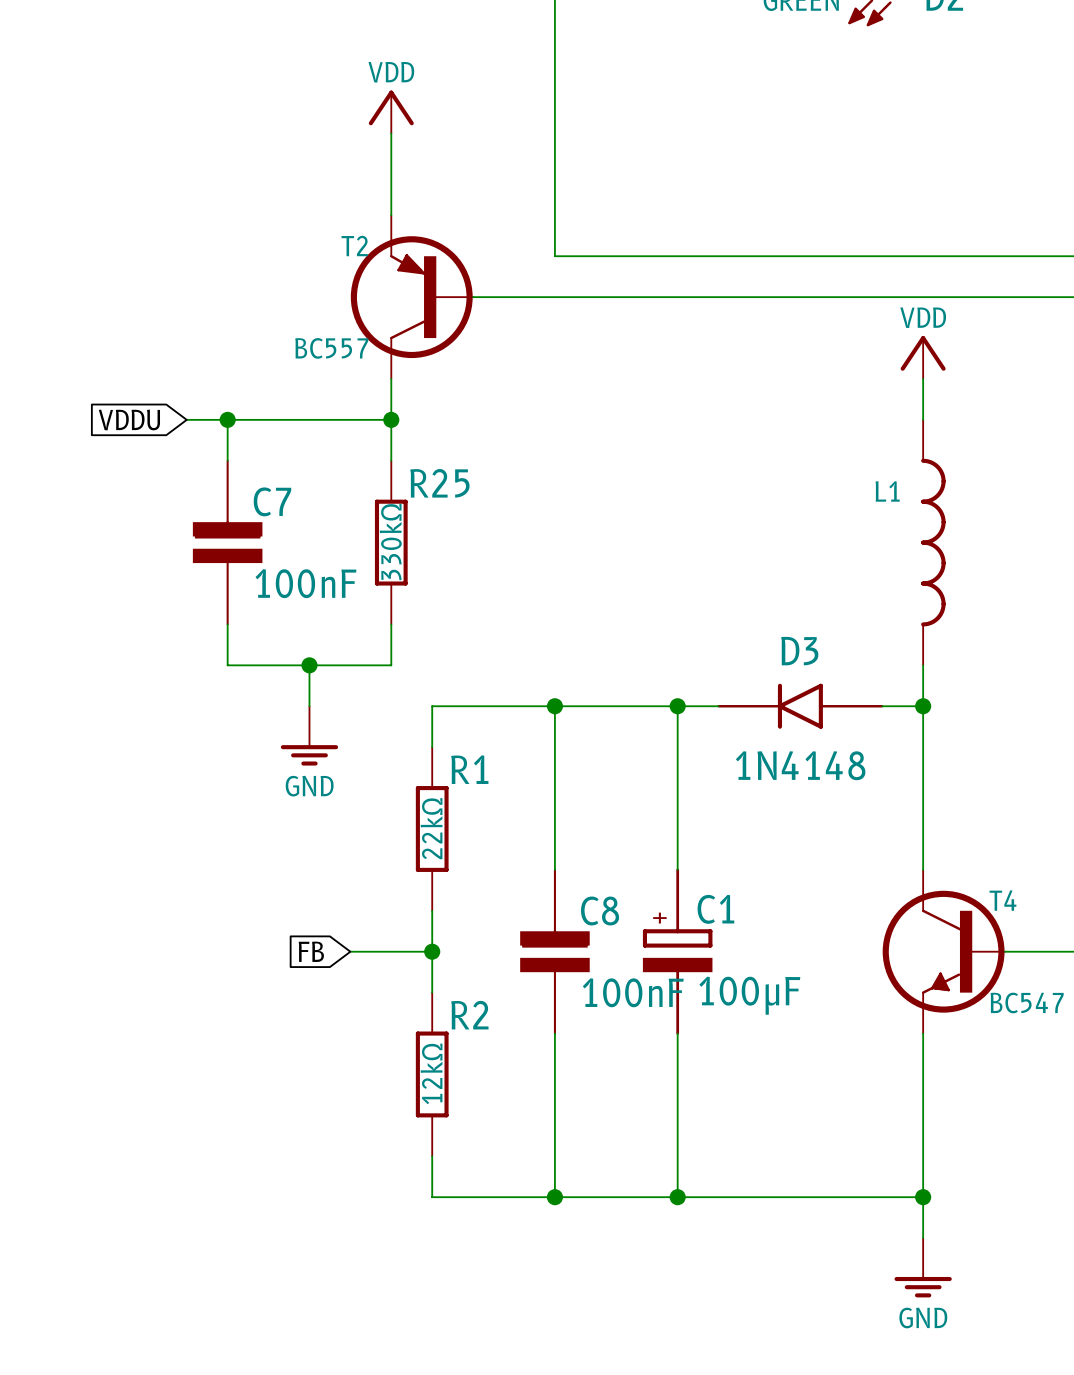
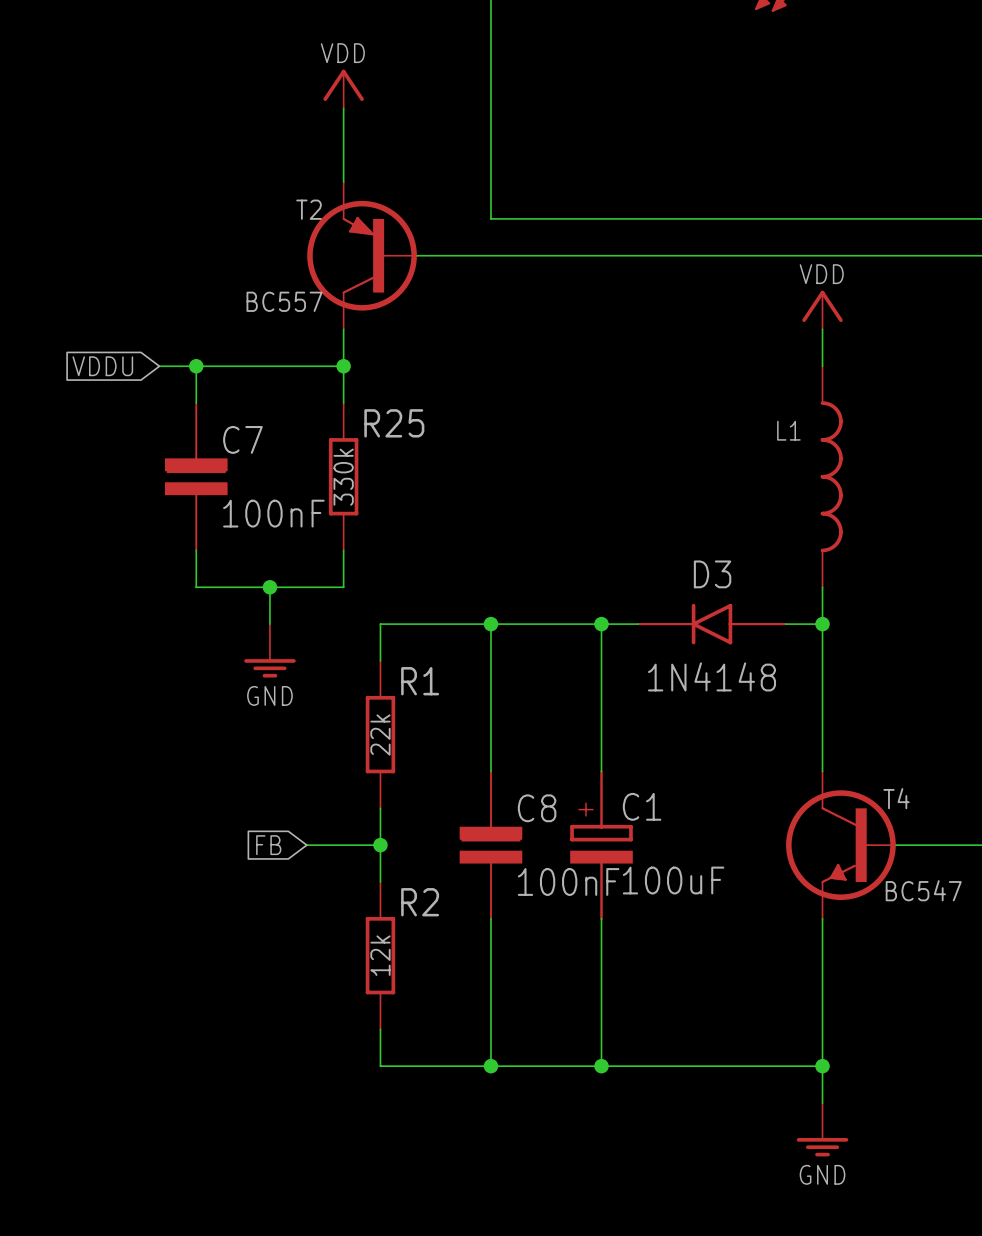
R25 value: 330kΩ (390, 542) -> 330k (343, 477)
R1 value: 22kΩ (431, 828) -> 22k (380, 735)
C1 value: 100μF (749, 995) -> 100uF (673, 880)
R2 value: 12kΩ (431, 1073) -> 12k (380, 955)

